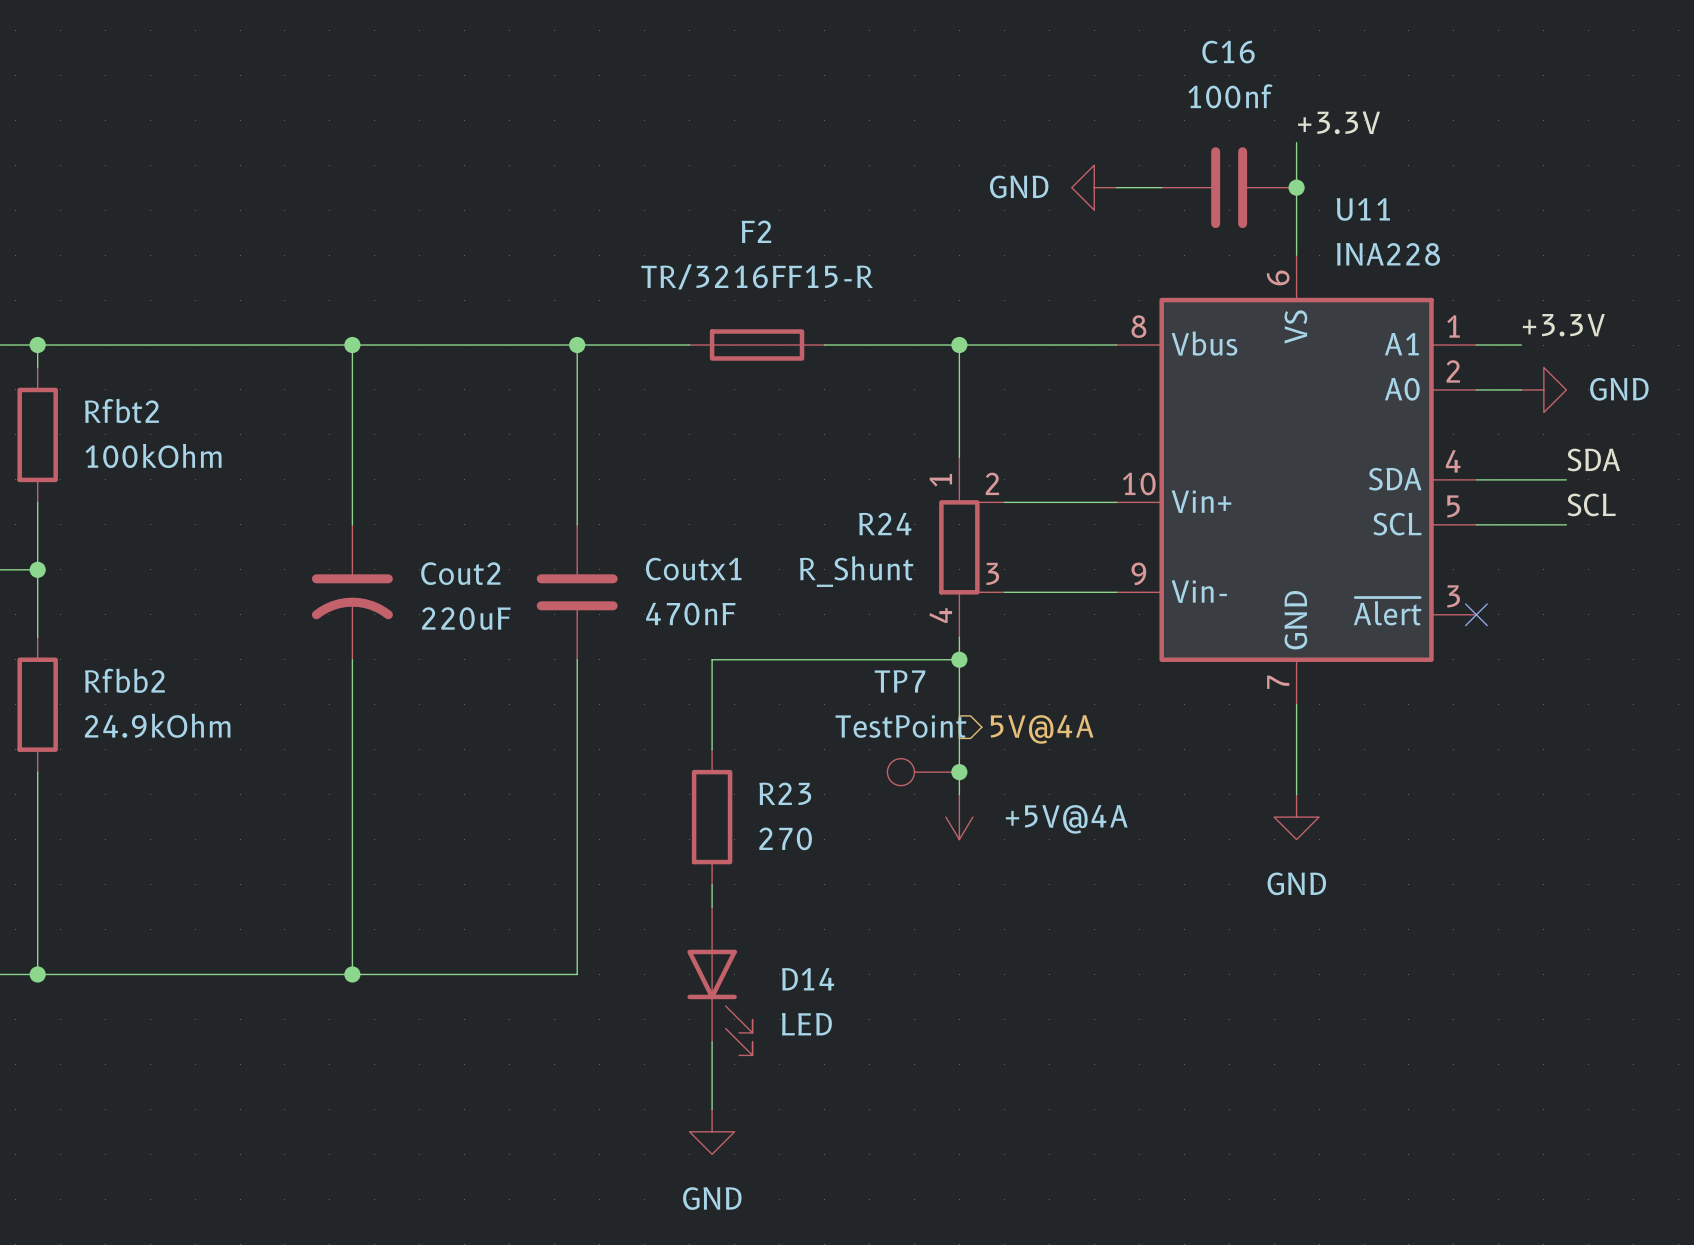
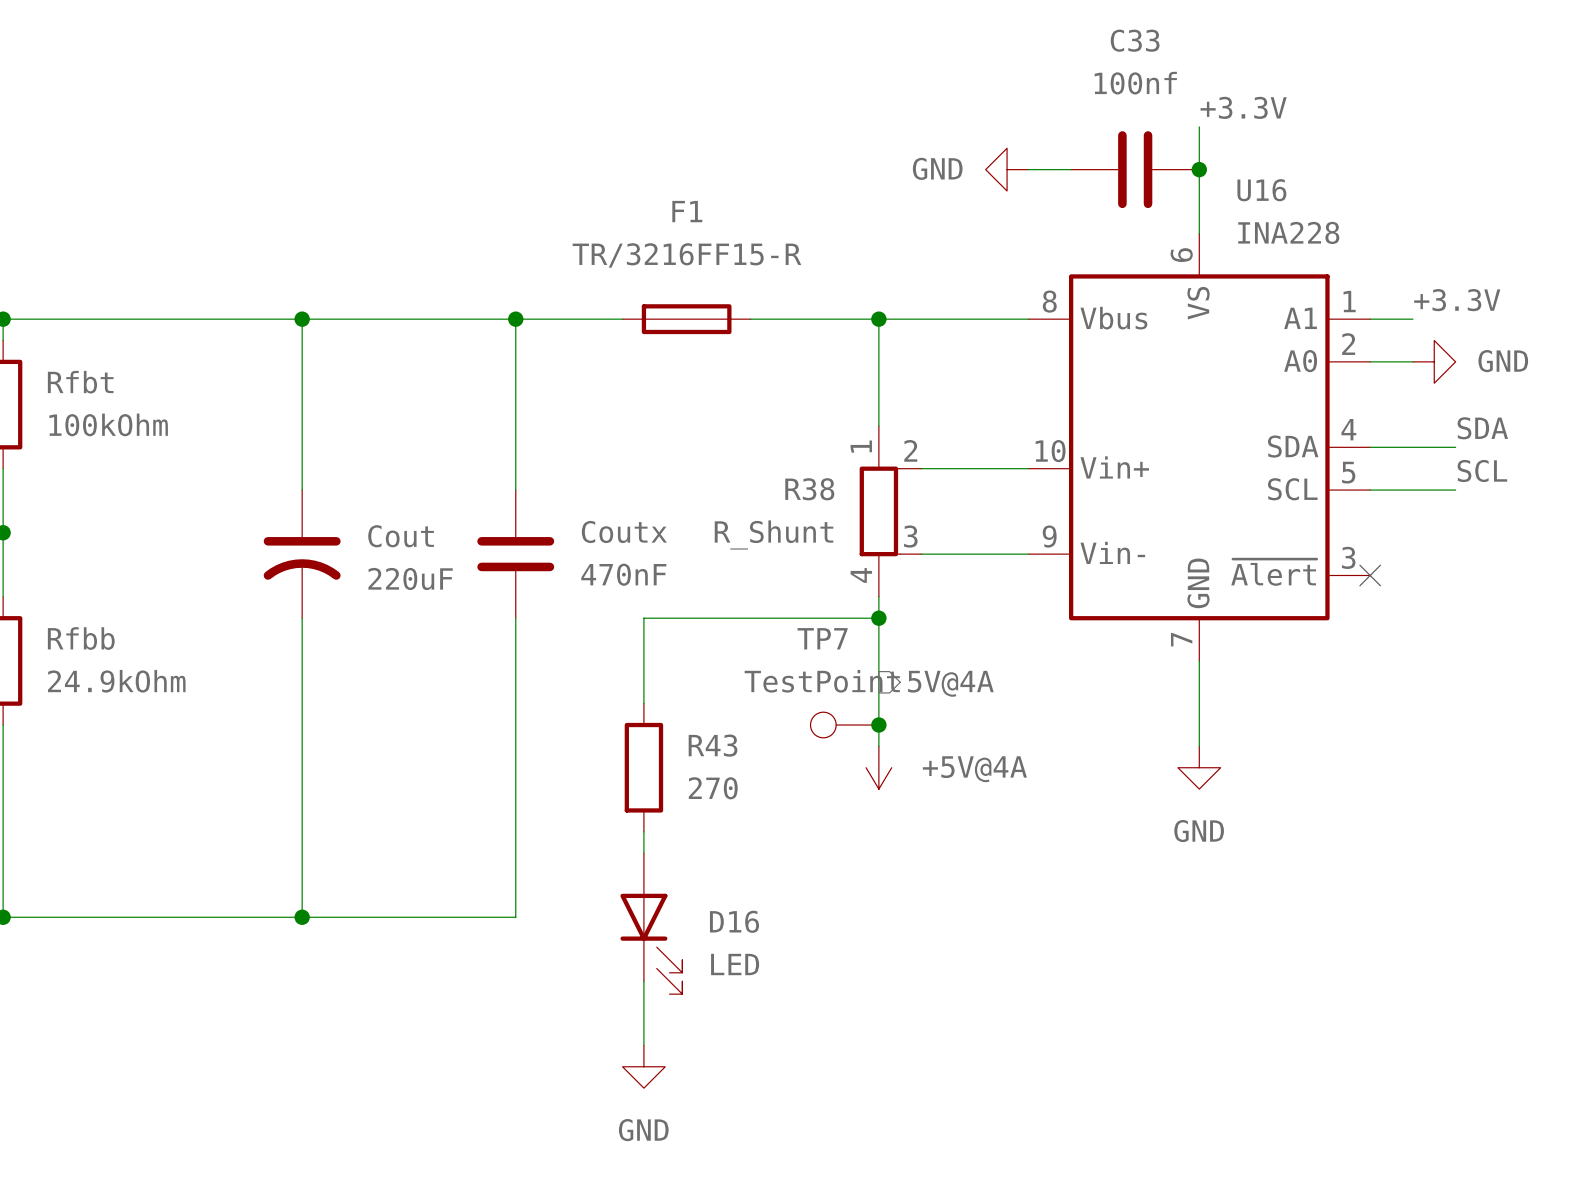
C16 name: C16 (1228, 52) -> C33 (1135, 40)
U11 name: U11 (1363, 209) -> U16 (1261, 190)
F2 name: F2 (756, 231) -> F1 (687, 211)
Rfbt2 name: Rfbt2 (121, 411) -> Rfbt (80, 382)
R24 name: R24 (885, 524) -> R38 (809, 489)
Coutx1 name: Coutx1 (693, 569) -> Coutx (624, 531)
Cout2 name: Cout2 (460, 573) -> Cout (401, 536)
Rfbb2 name: Rfbb2 (124, 680) -> Rfbb (81, 638)
R23 name: R23 (785, 793) -> R43 (713, 745)
D14 name: D14 (808, 979) -> D16 (734, 921)

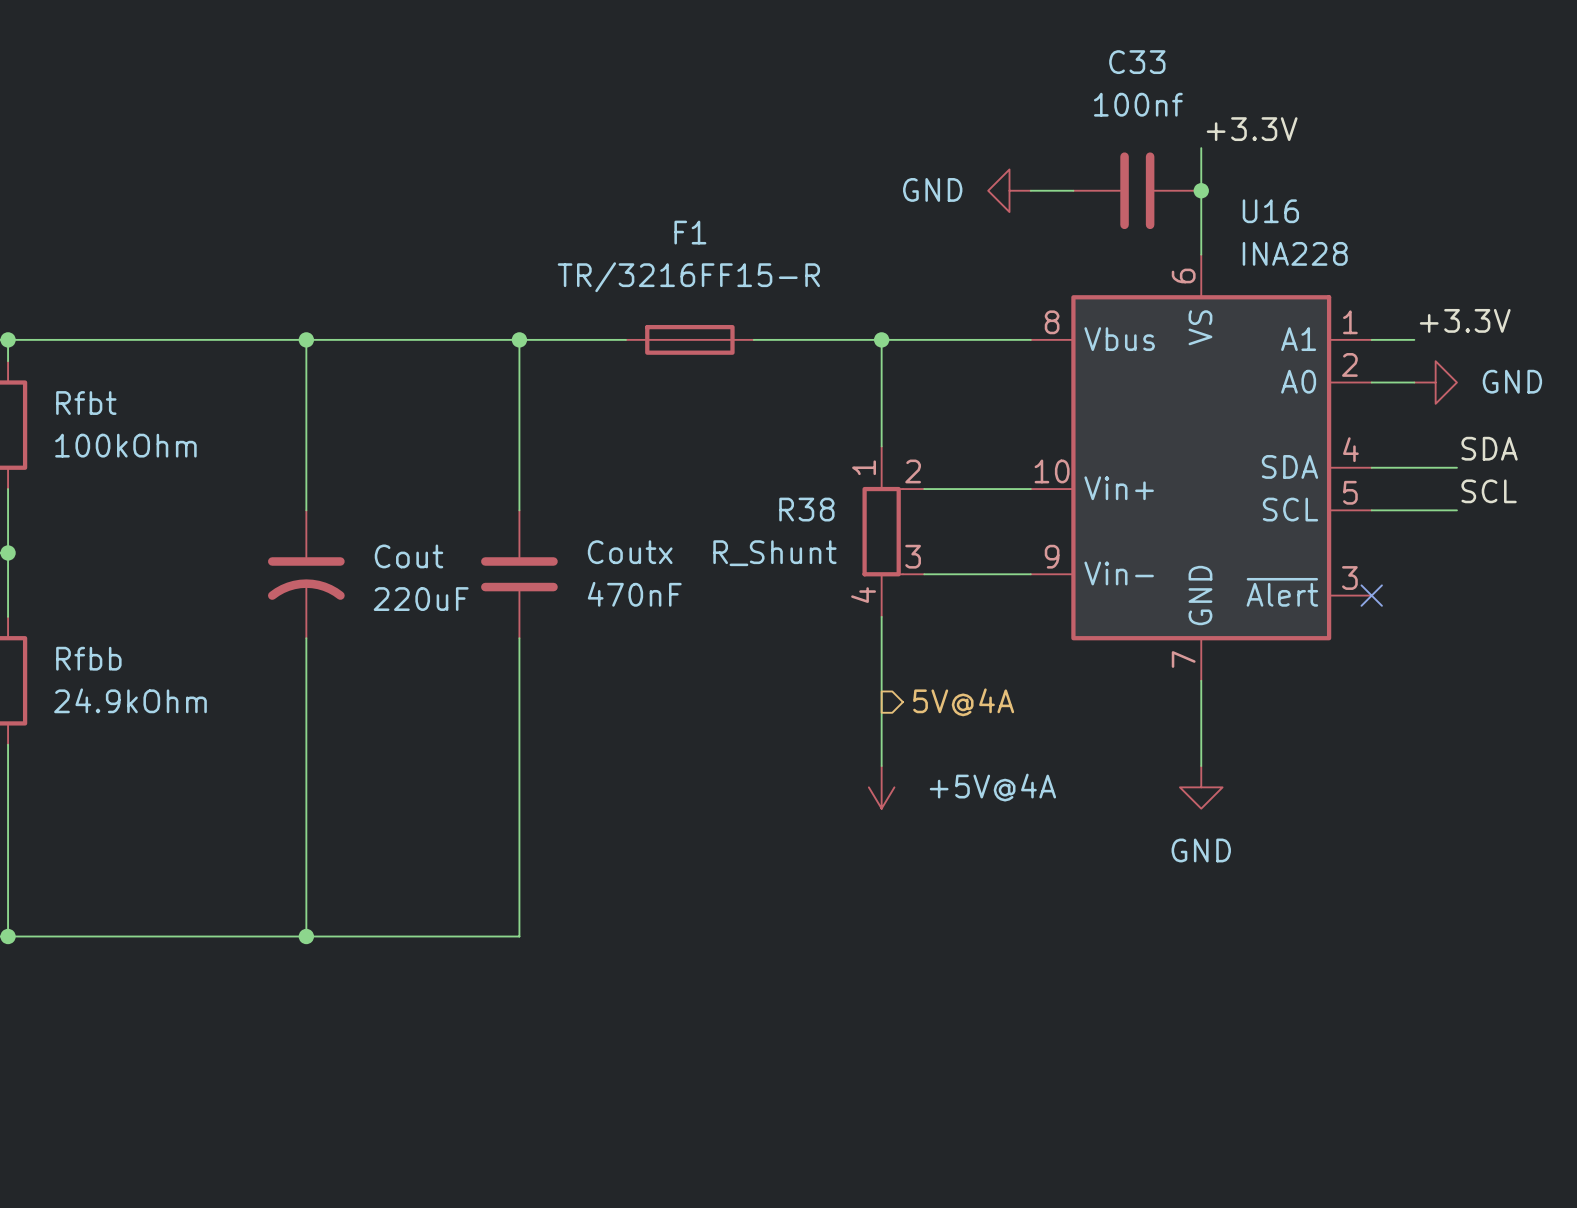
wire: (878, 618) (643, 618) (643, 703) -> none
junction: (878, 618) -> none
TP7: TestPoint (844, 725) -> none
junction: (878, 725) -> none
R43: 270 (643, 767) -> none
wire: (643, 831) (643, 853) -> none
D16: LED (651, 923) -> none
wire: (643, 981) (643, 1045) -> none
power symbol: GND (643, 1066) -> none

